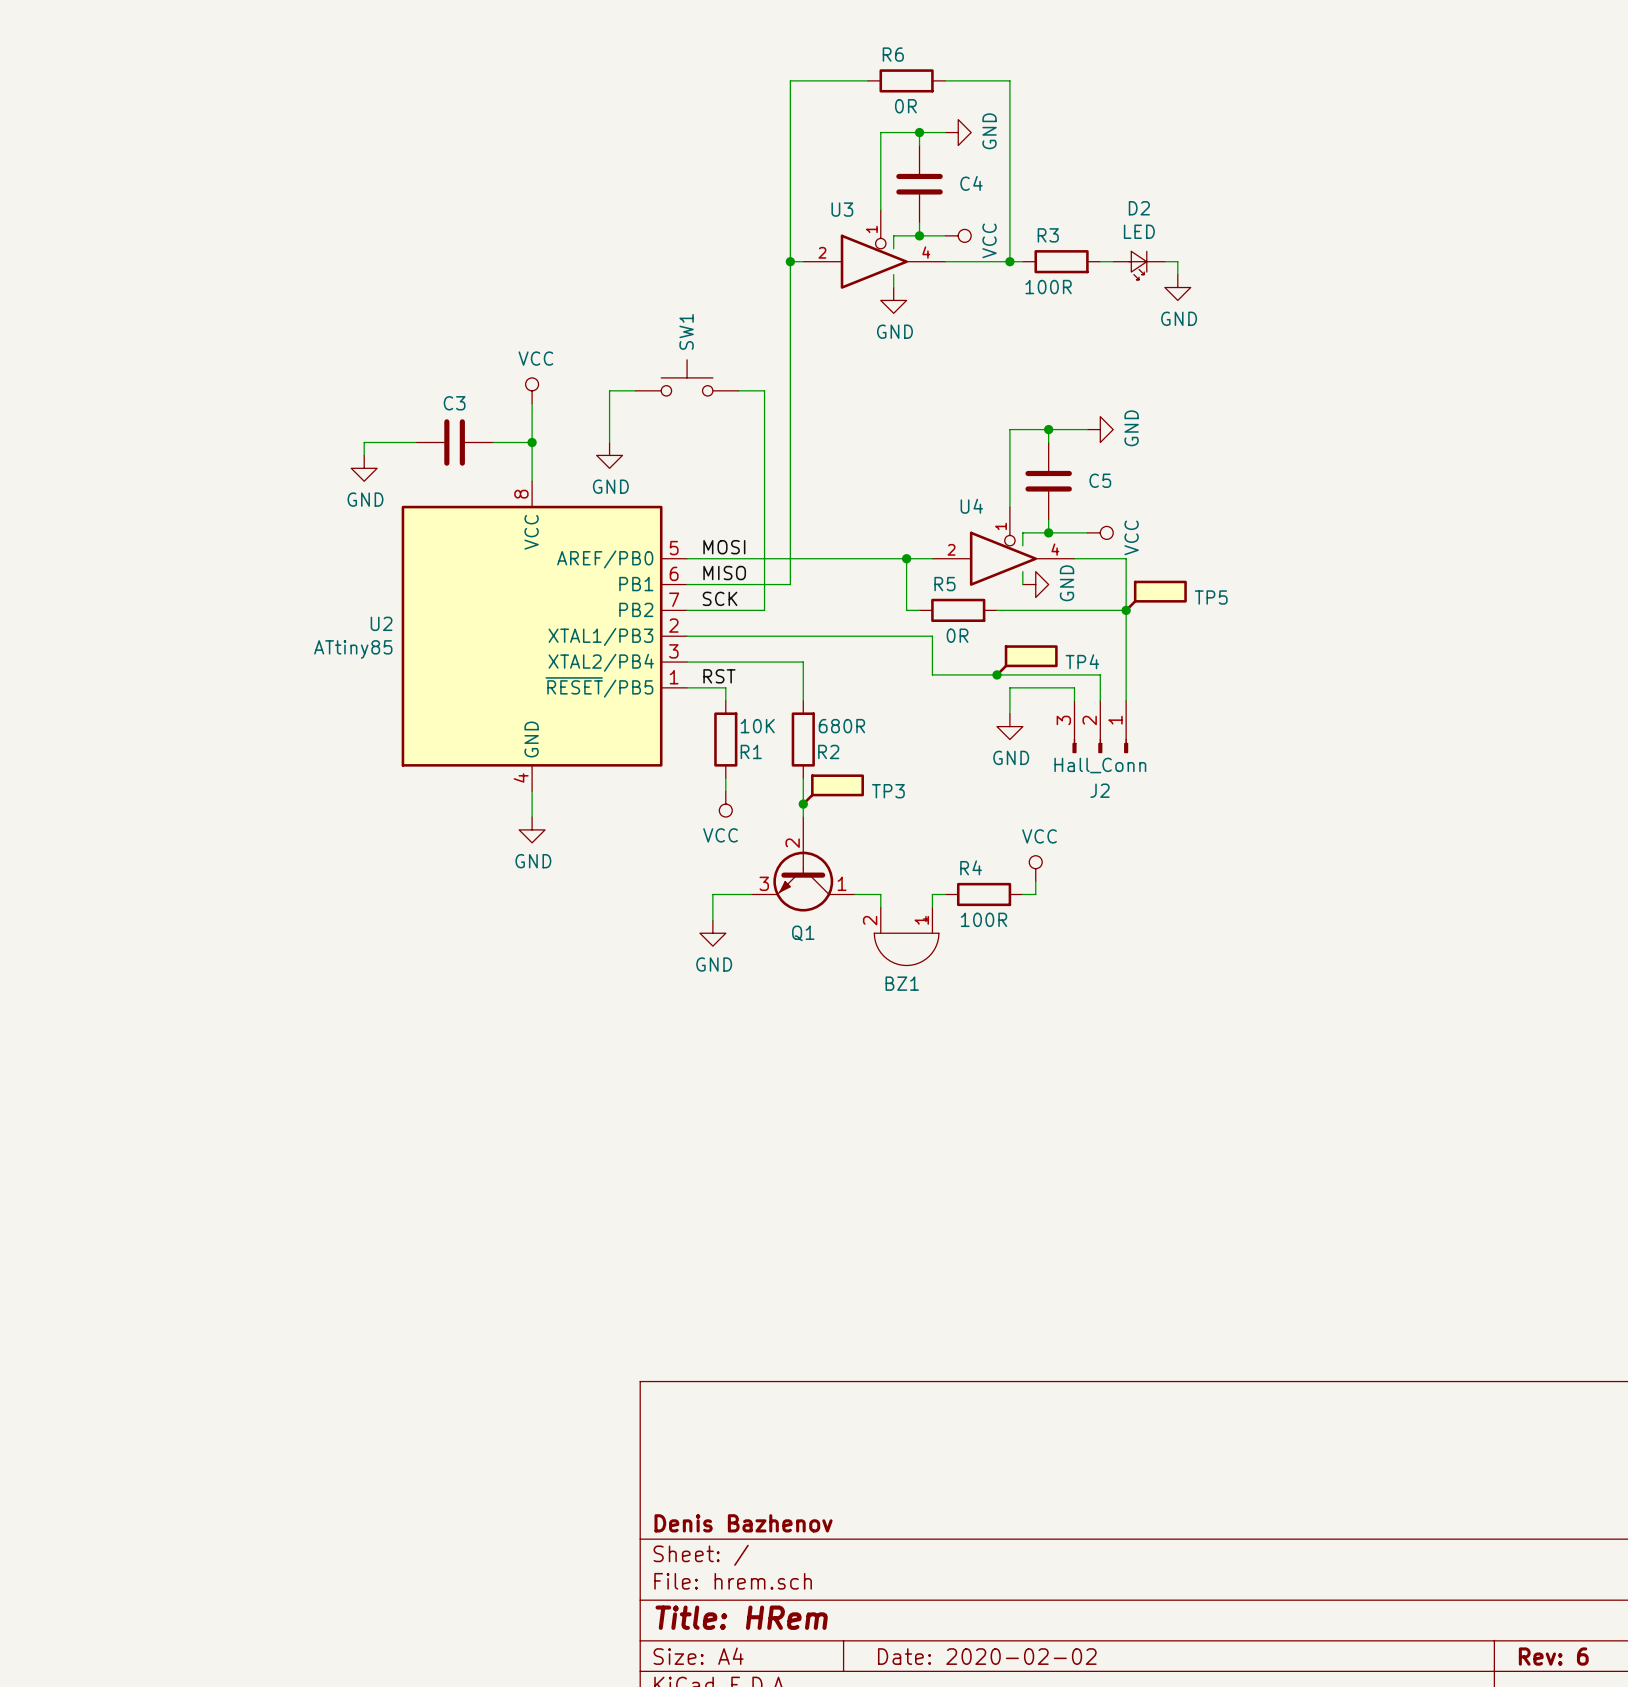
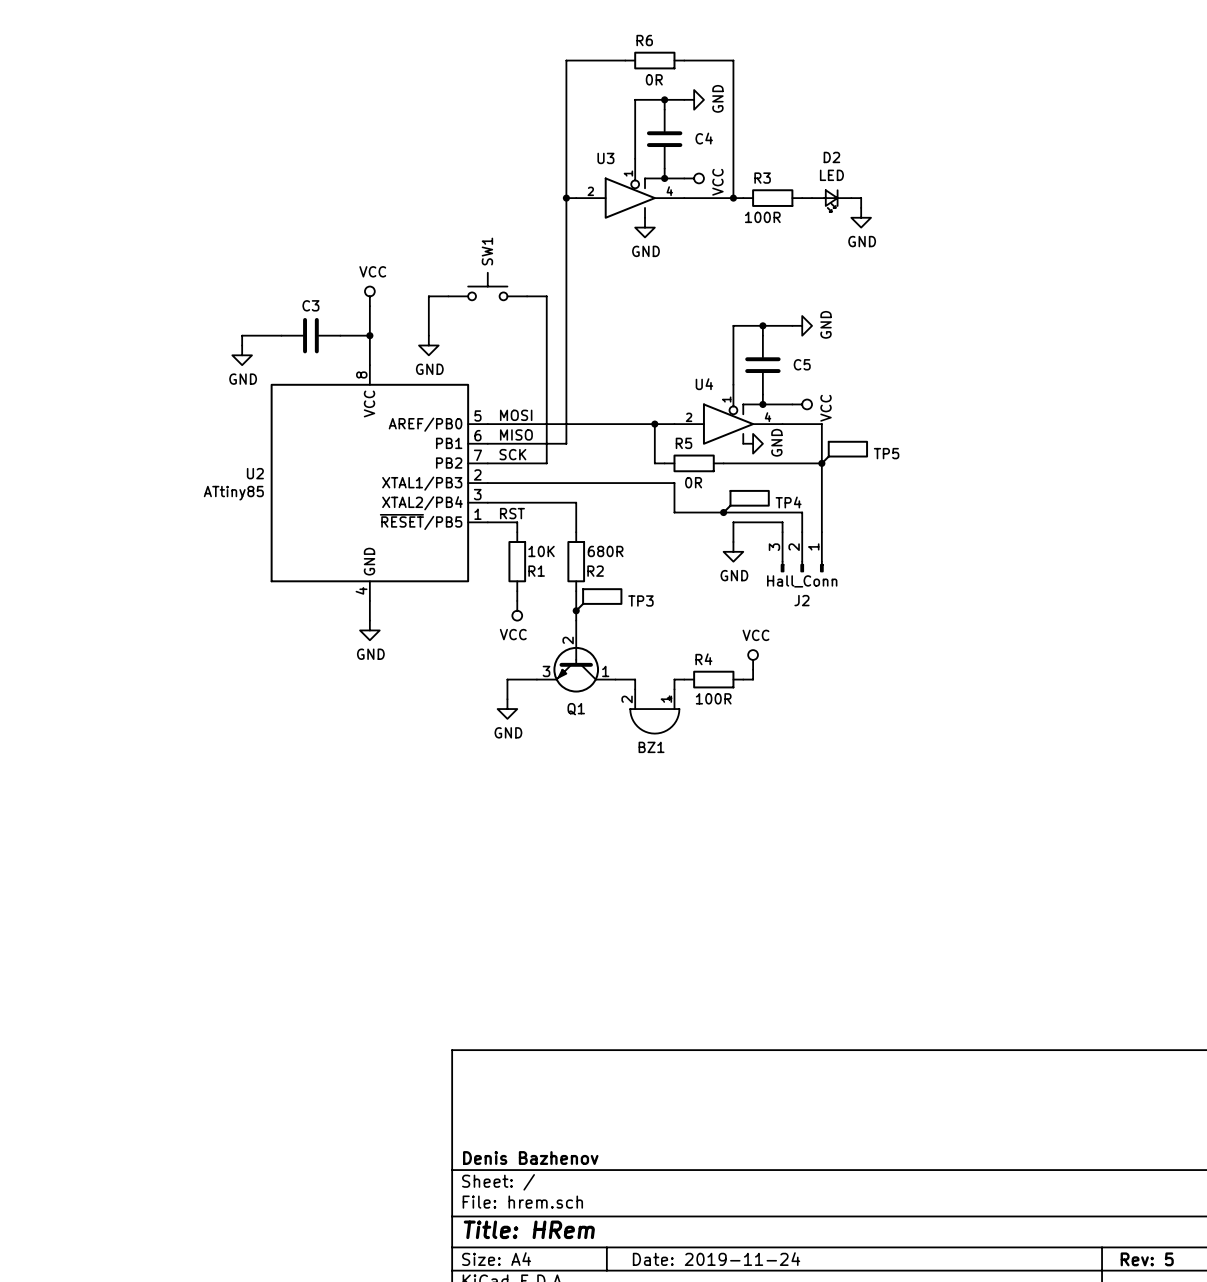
title block: Date: 2020-02-02 (987, 1656) -> Date: 2019-11-24 (716, 1259)
title block: Rev: 6 (1553, 1656) -> Rev: 5 (1147, 1259)

